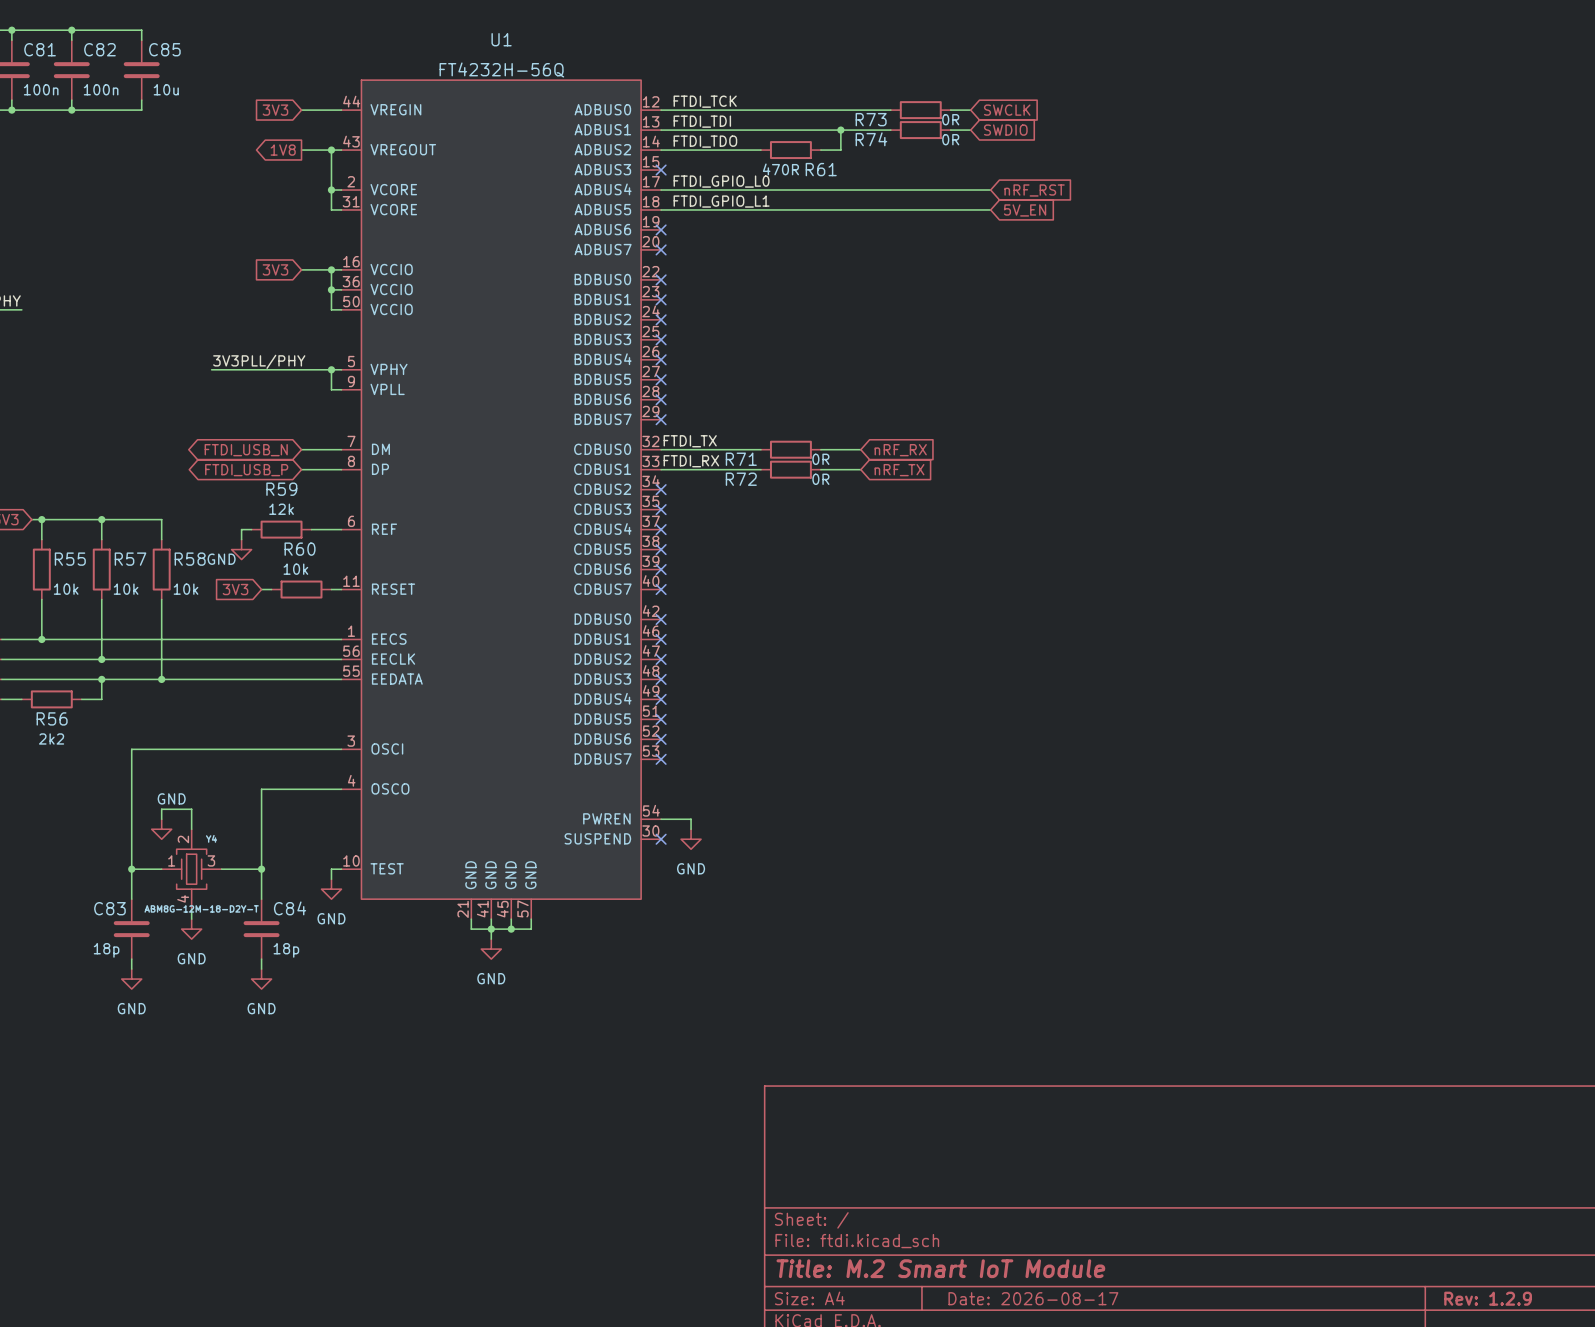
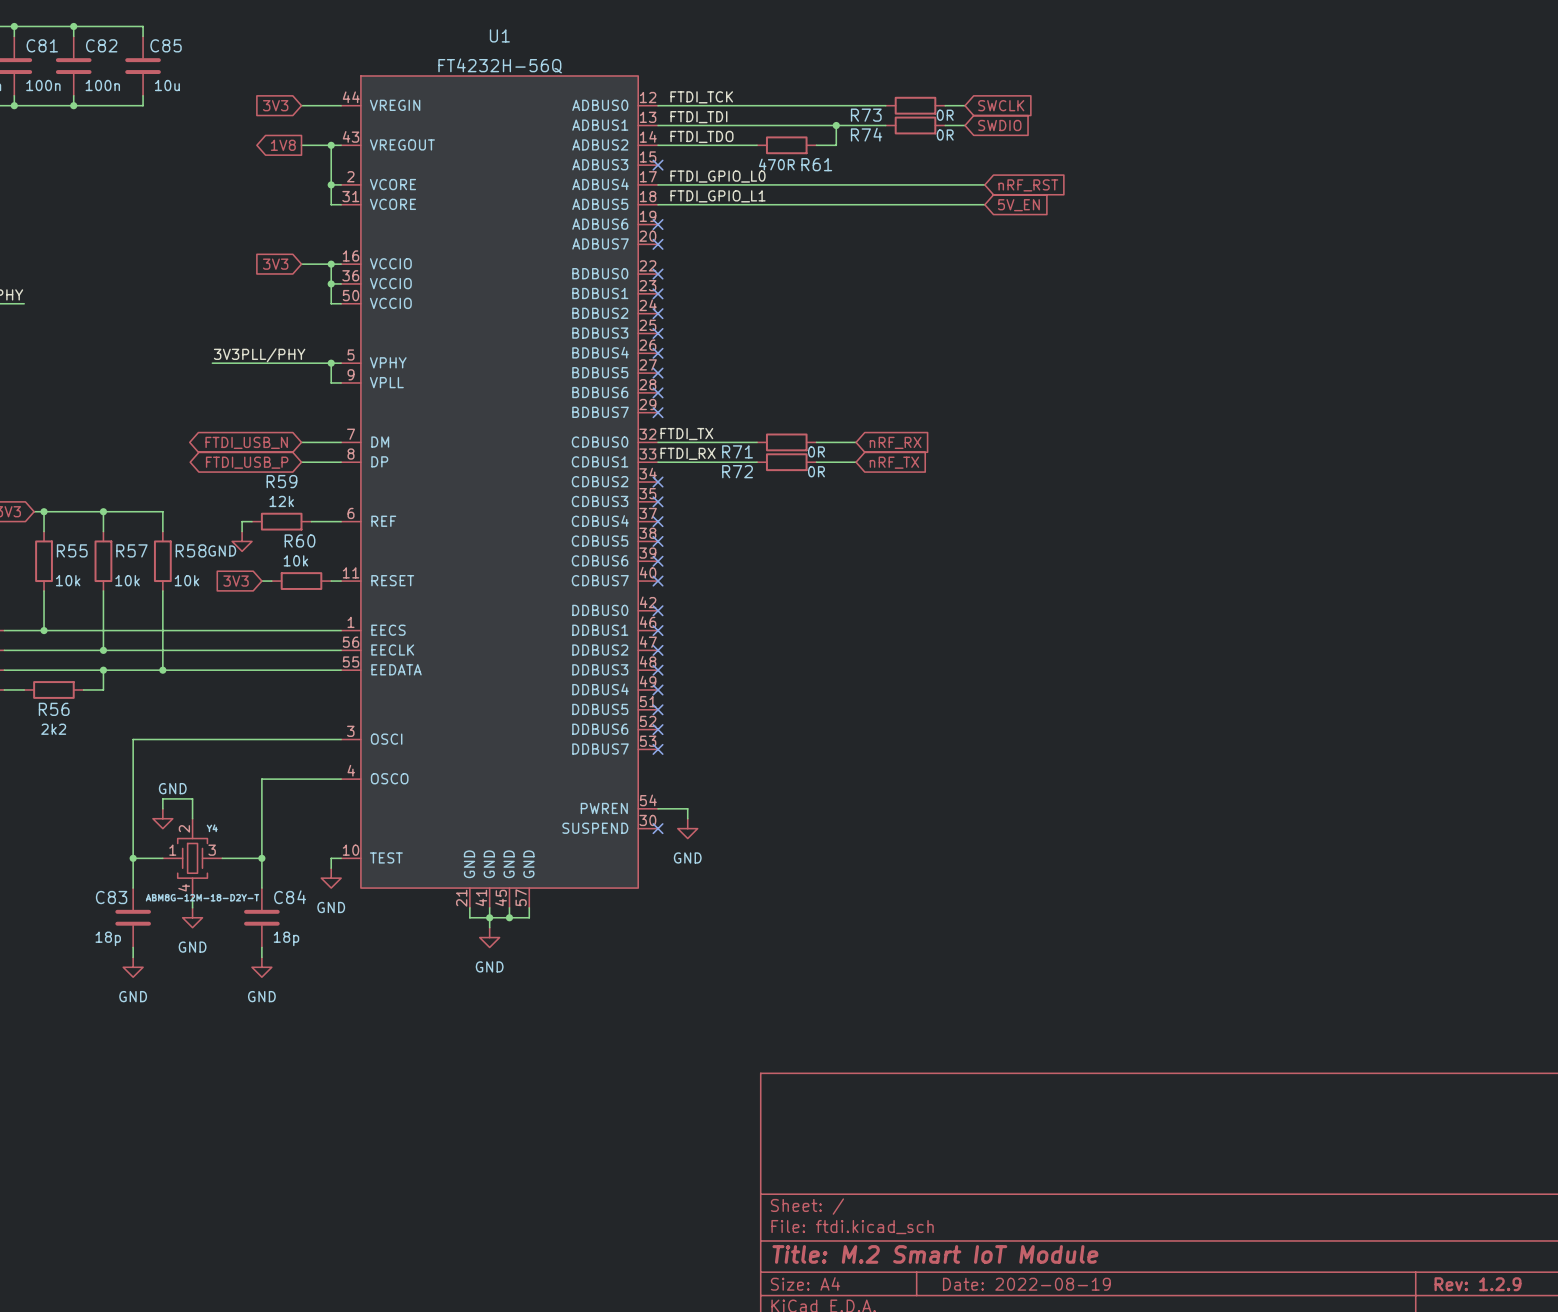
title block: Date: 2026-08-17 (1033, 1298) -> Date: 2022-08-19 (1026, 1284)

